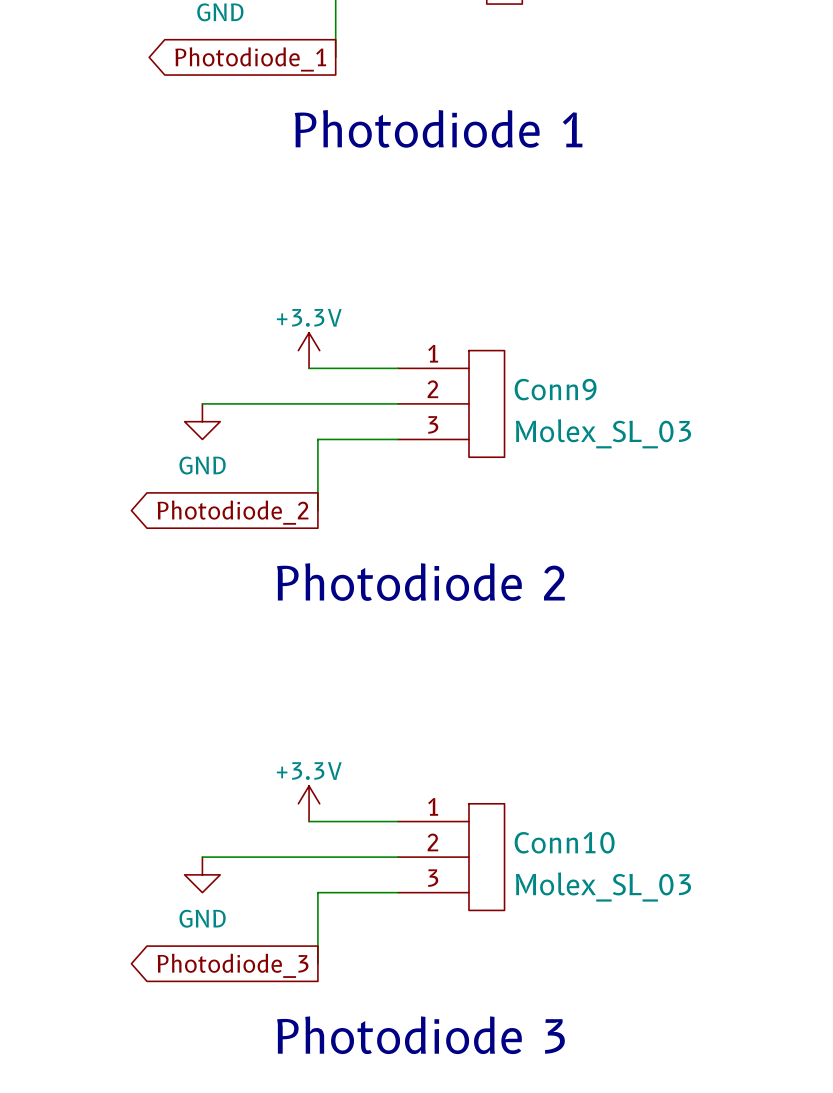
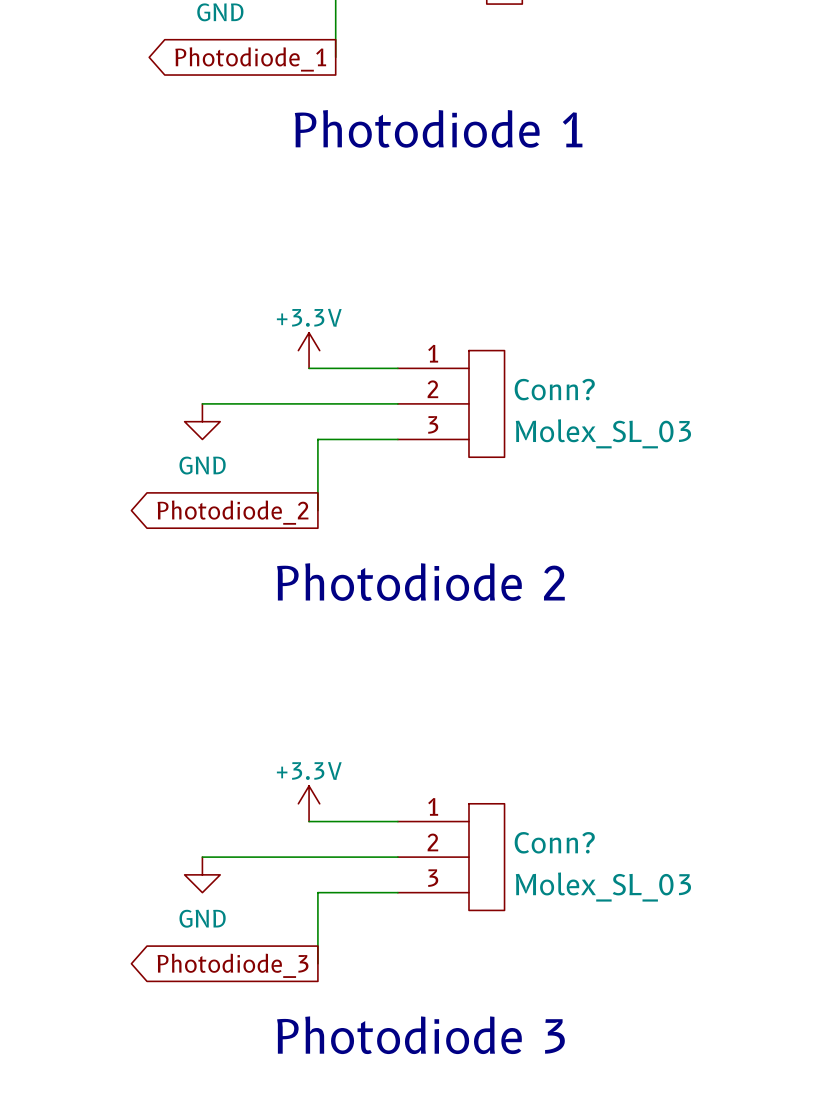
Conn9 name: Conn9 (555, 389) -> Conn? (554, 389)
Conn10 name: Conn10 (564, 842) -> Conn? (554, 842)

